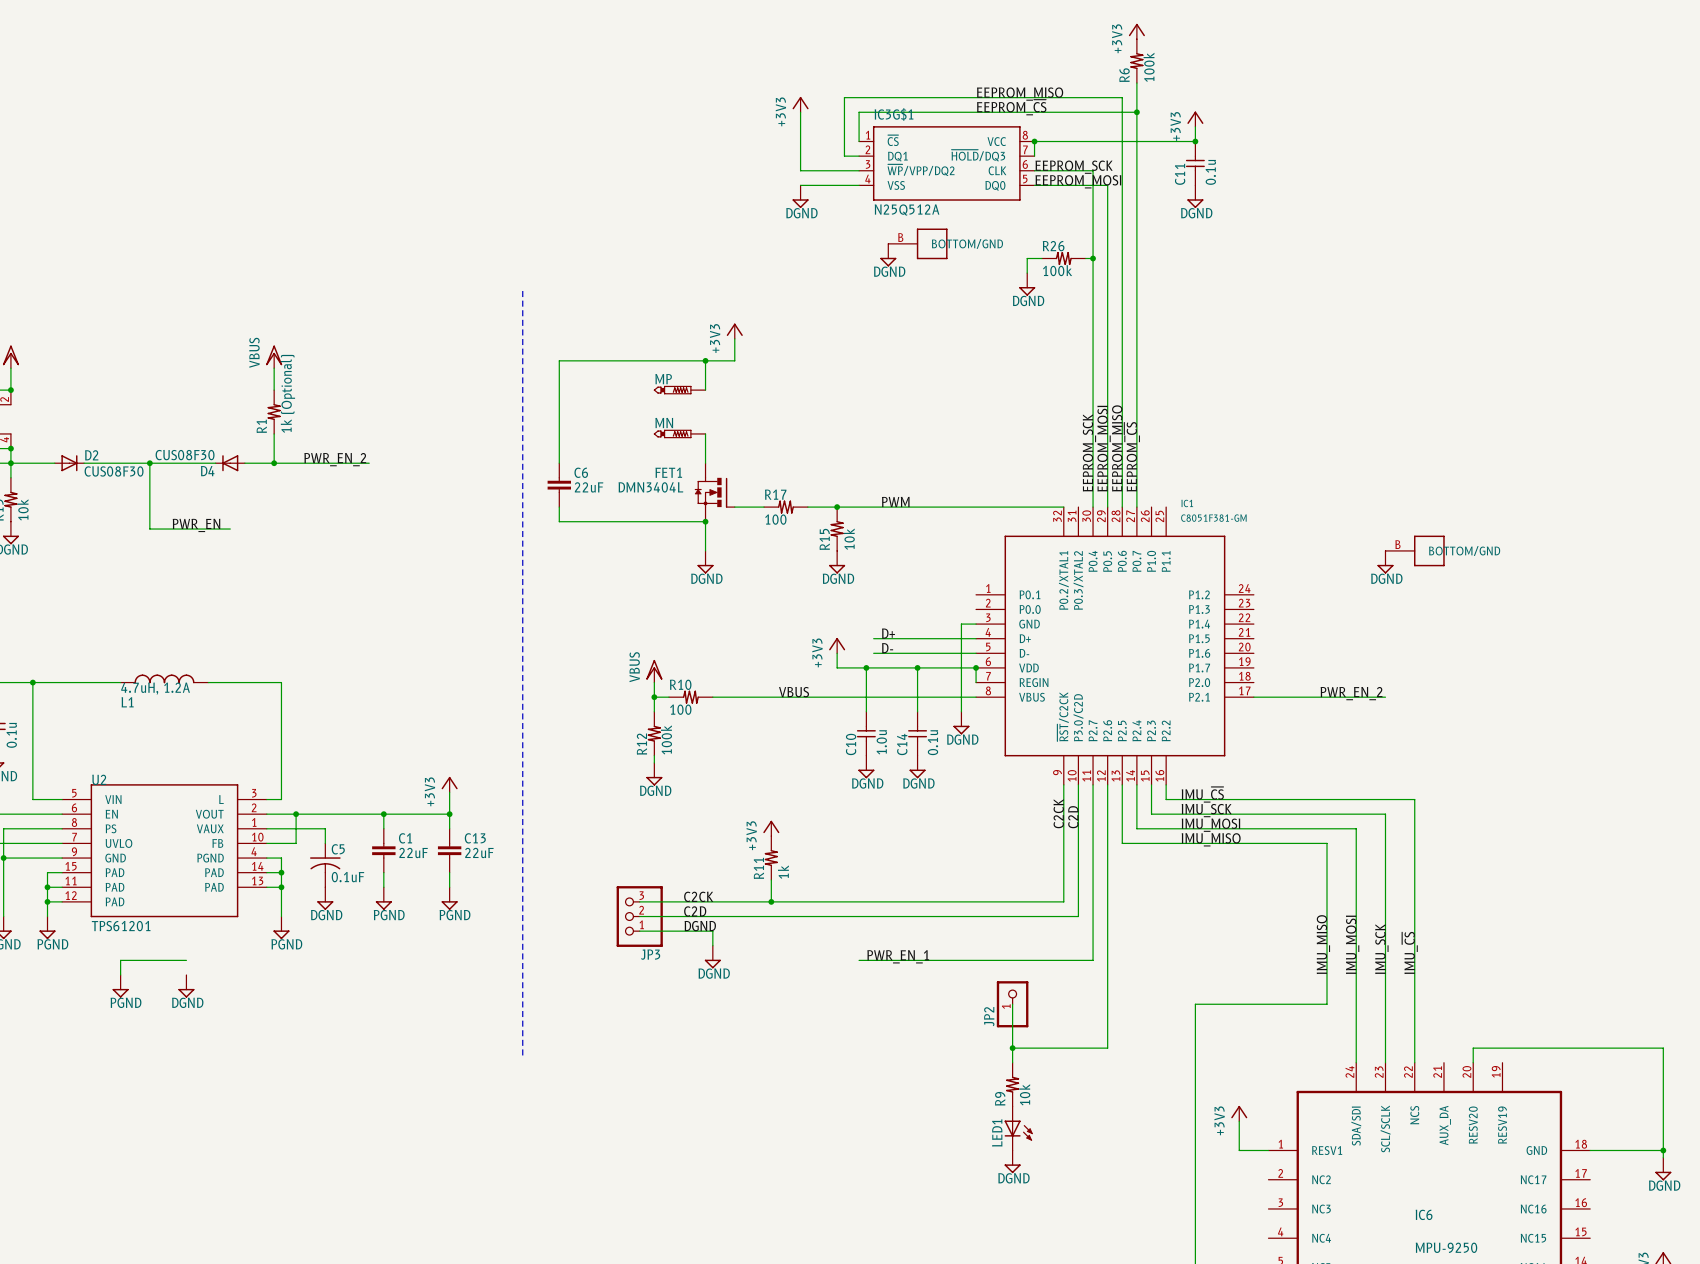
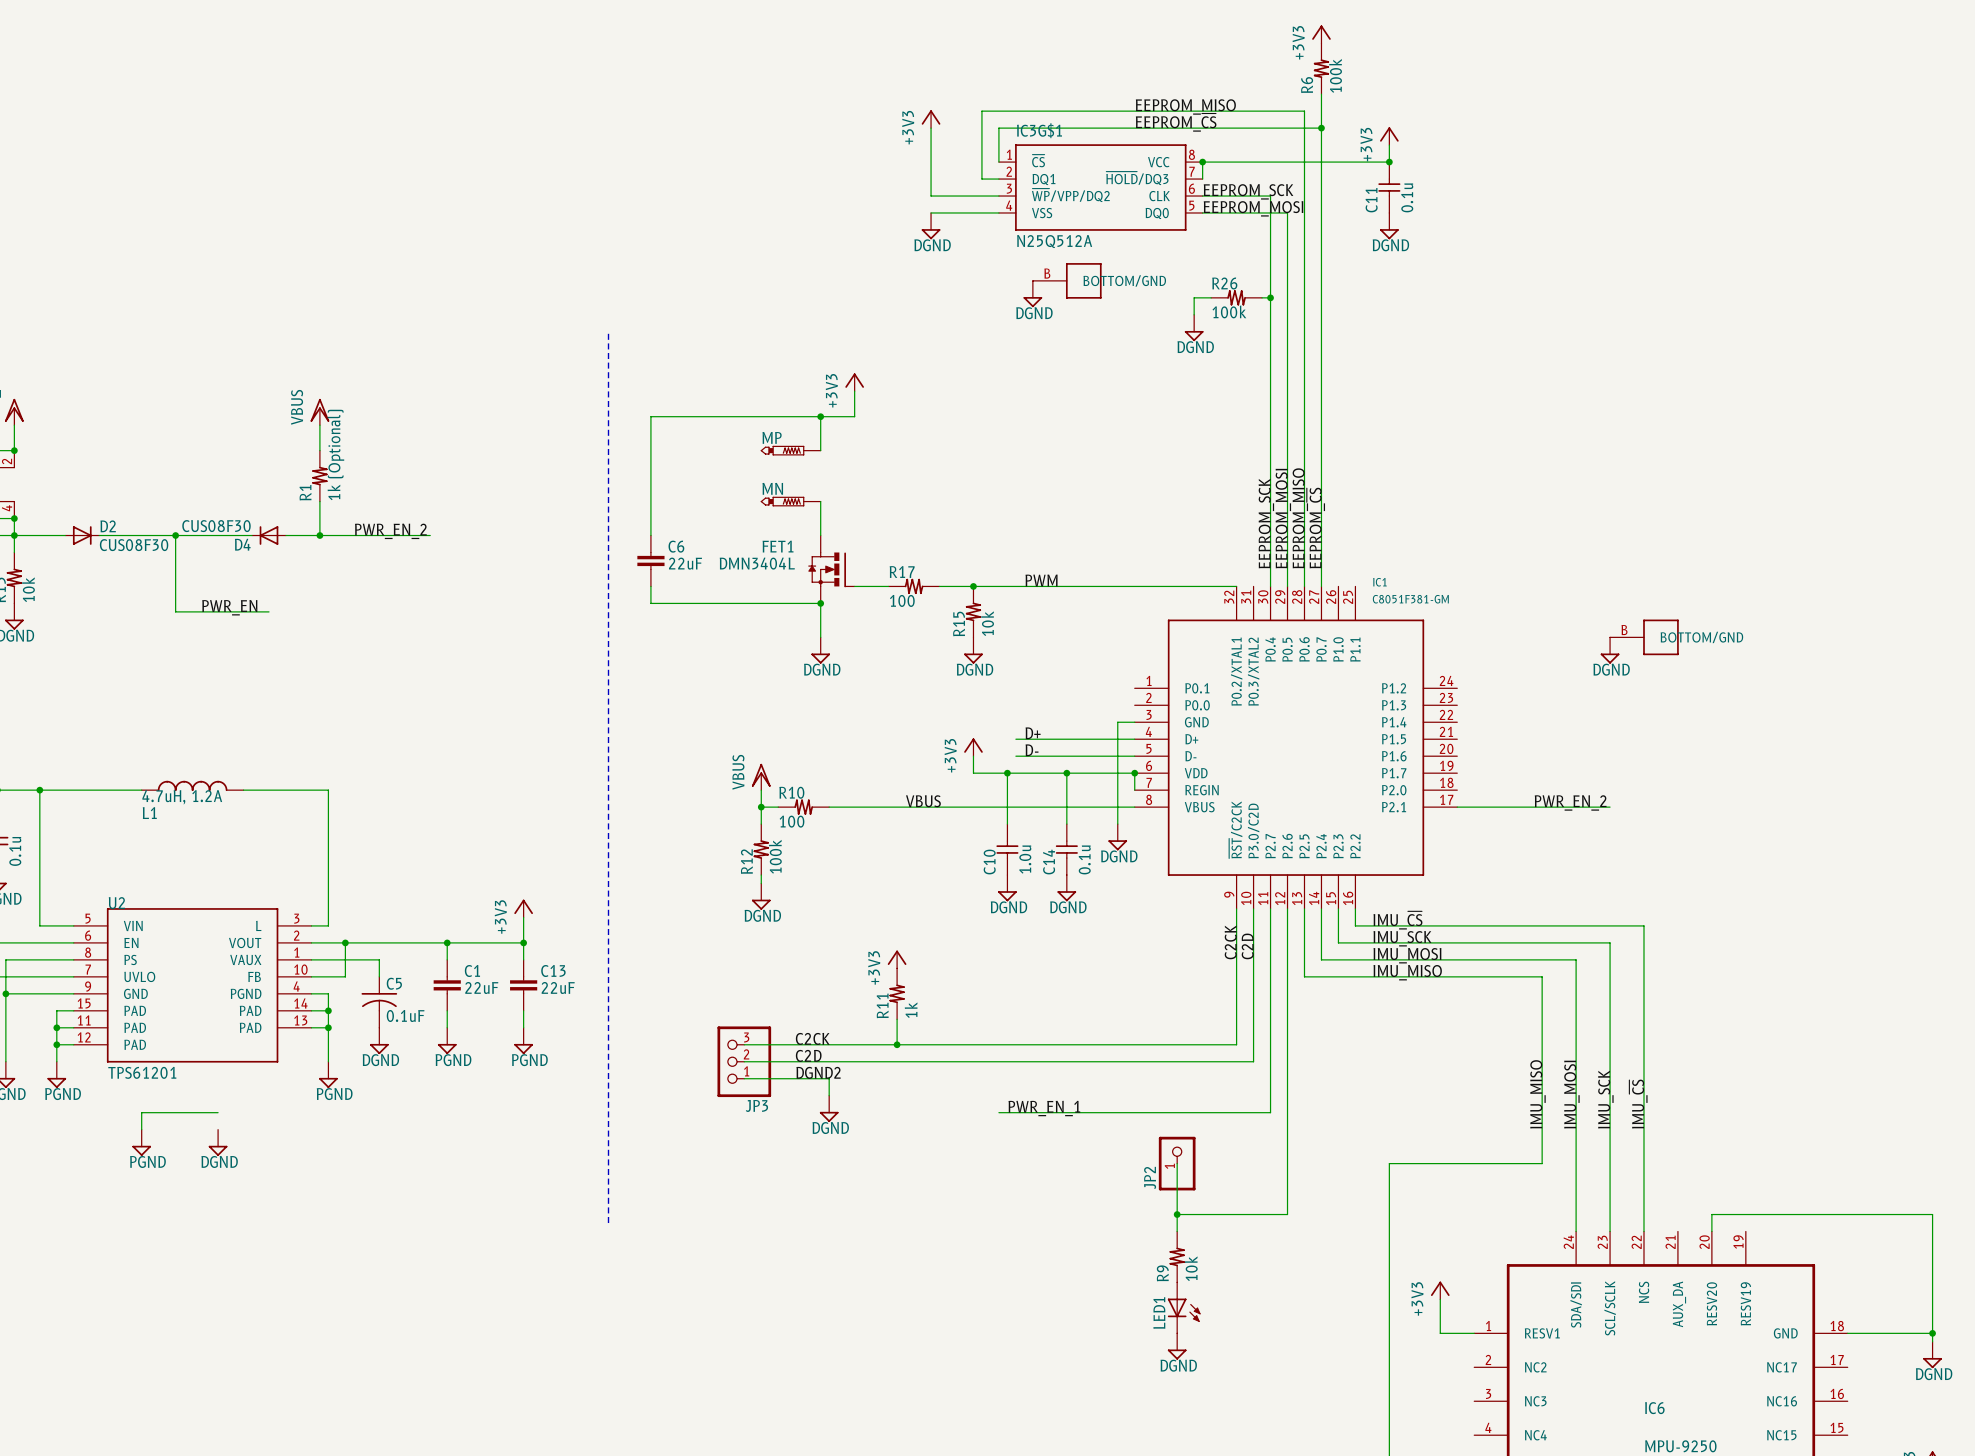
label: DGND (700, 926) -> DGND2 (818, 1072)

